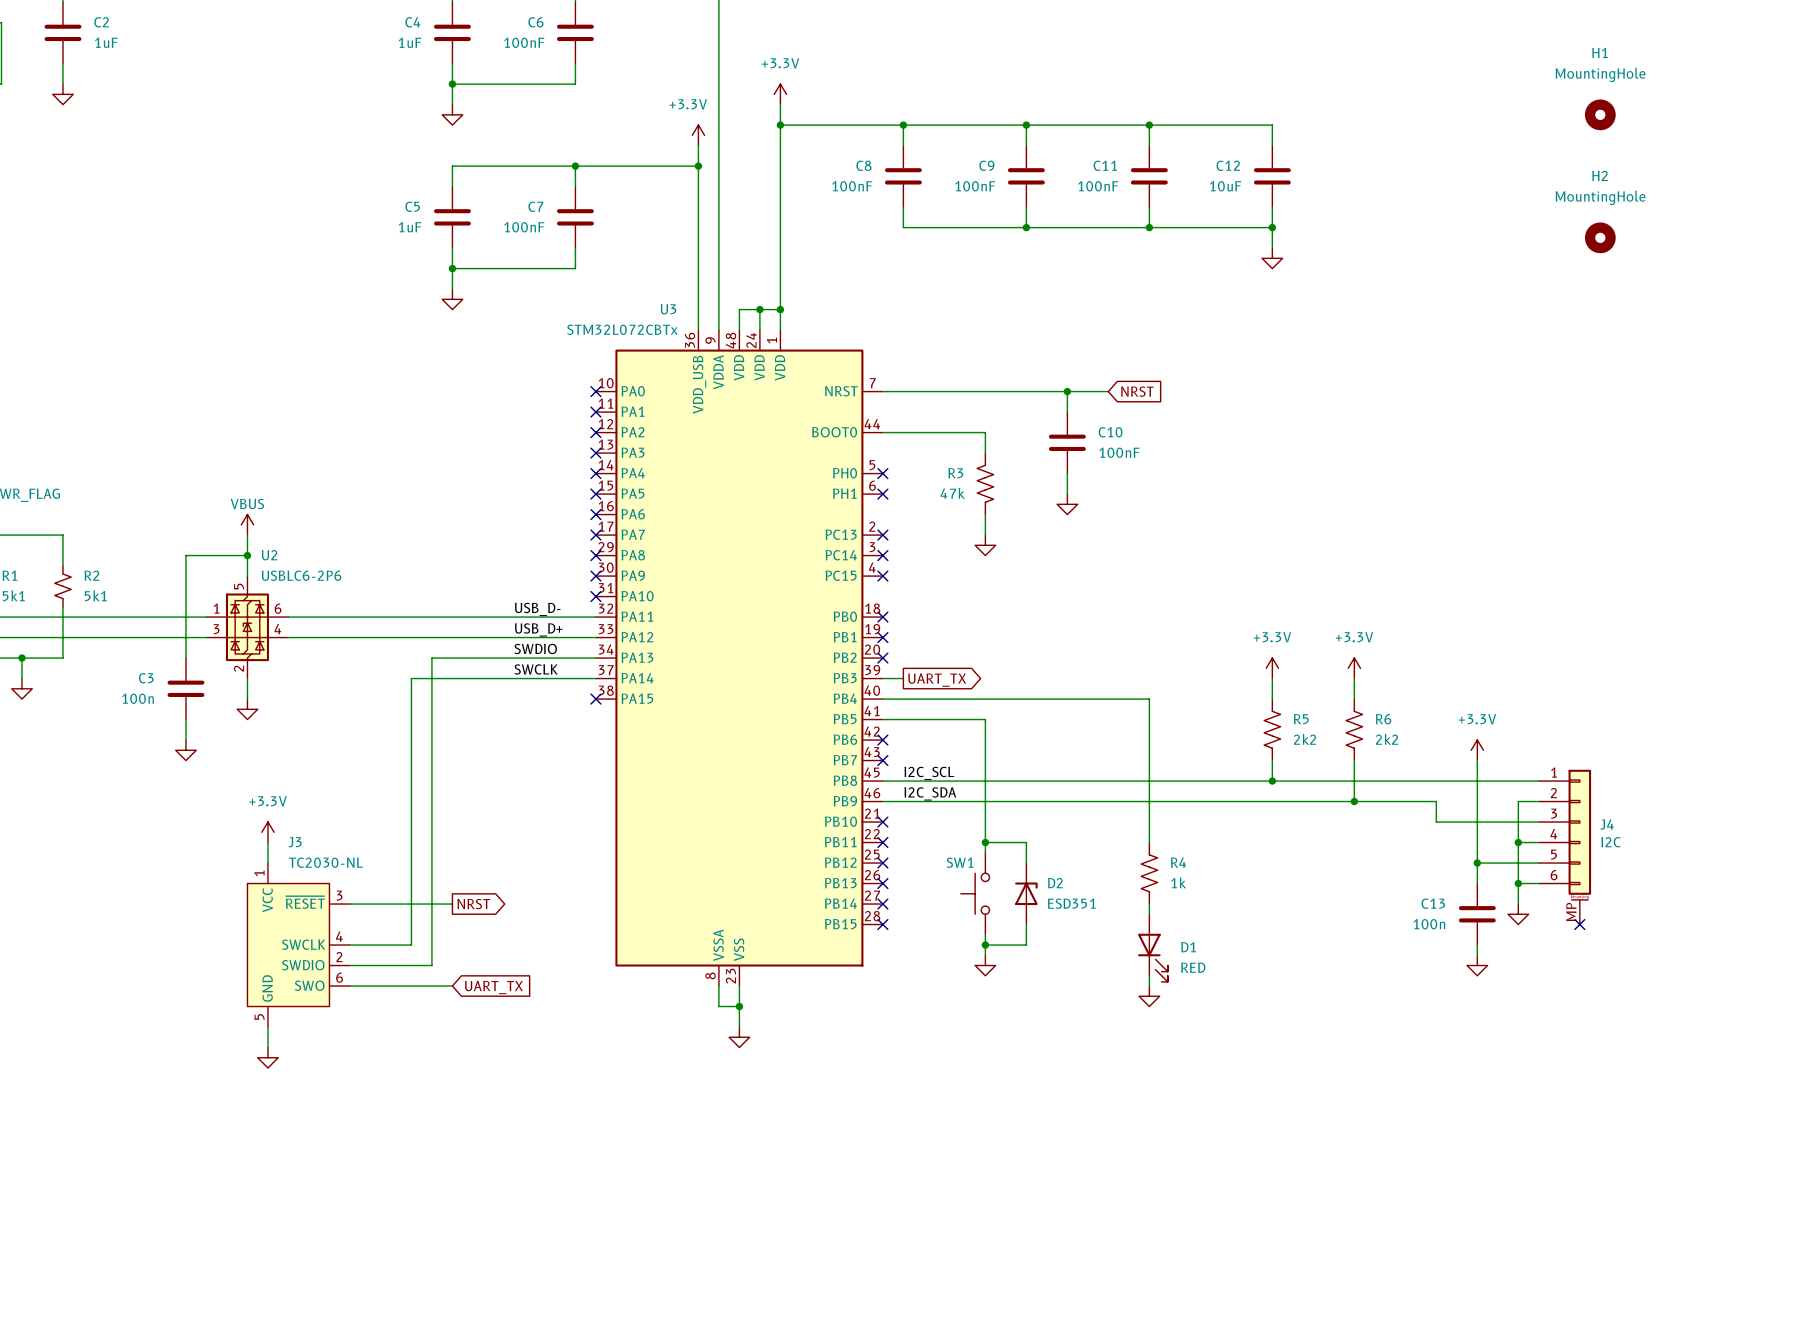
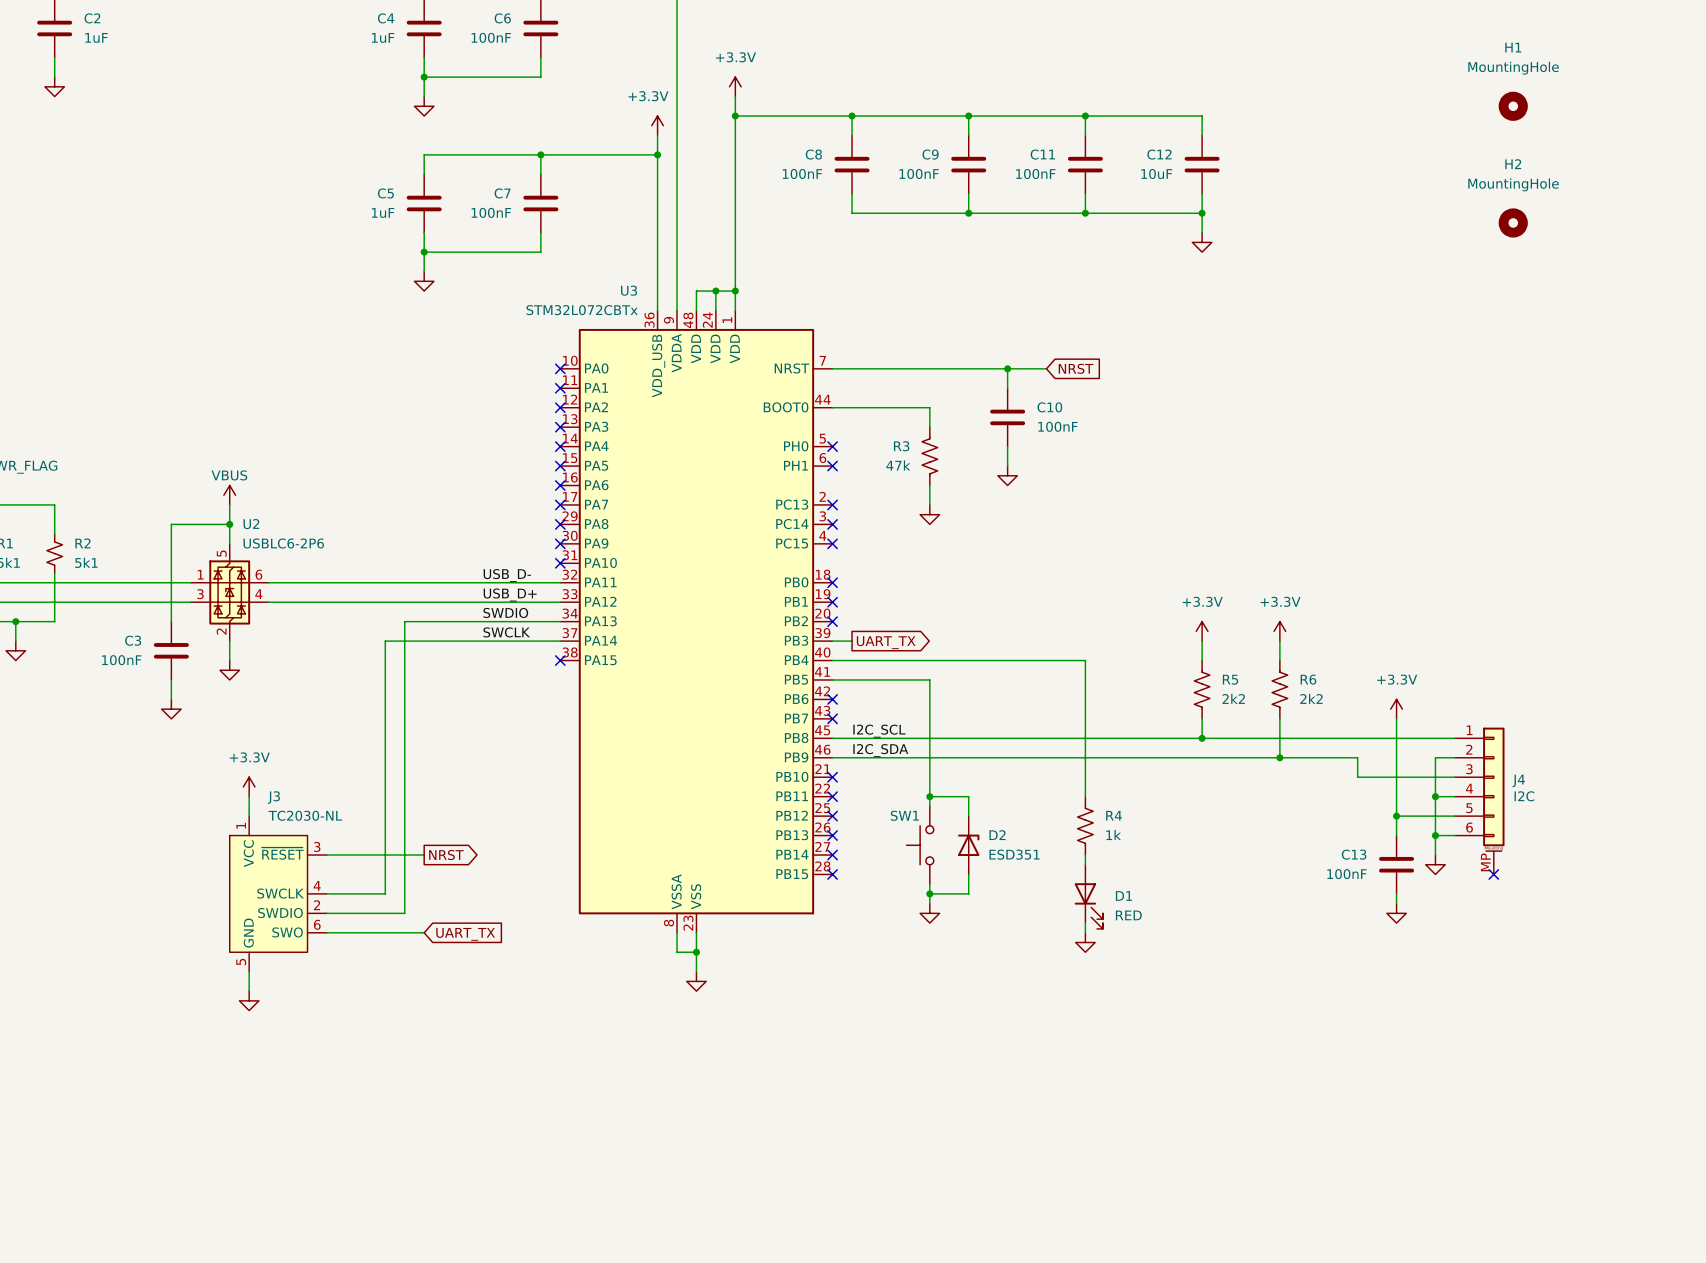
C3 value: 100n (138, 698) -> 100nF (121, 660)
C13 value: 100n (1429, 924) -> 100nF (1346, 874)

